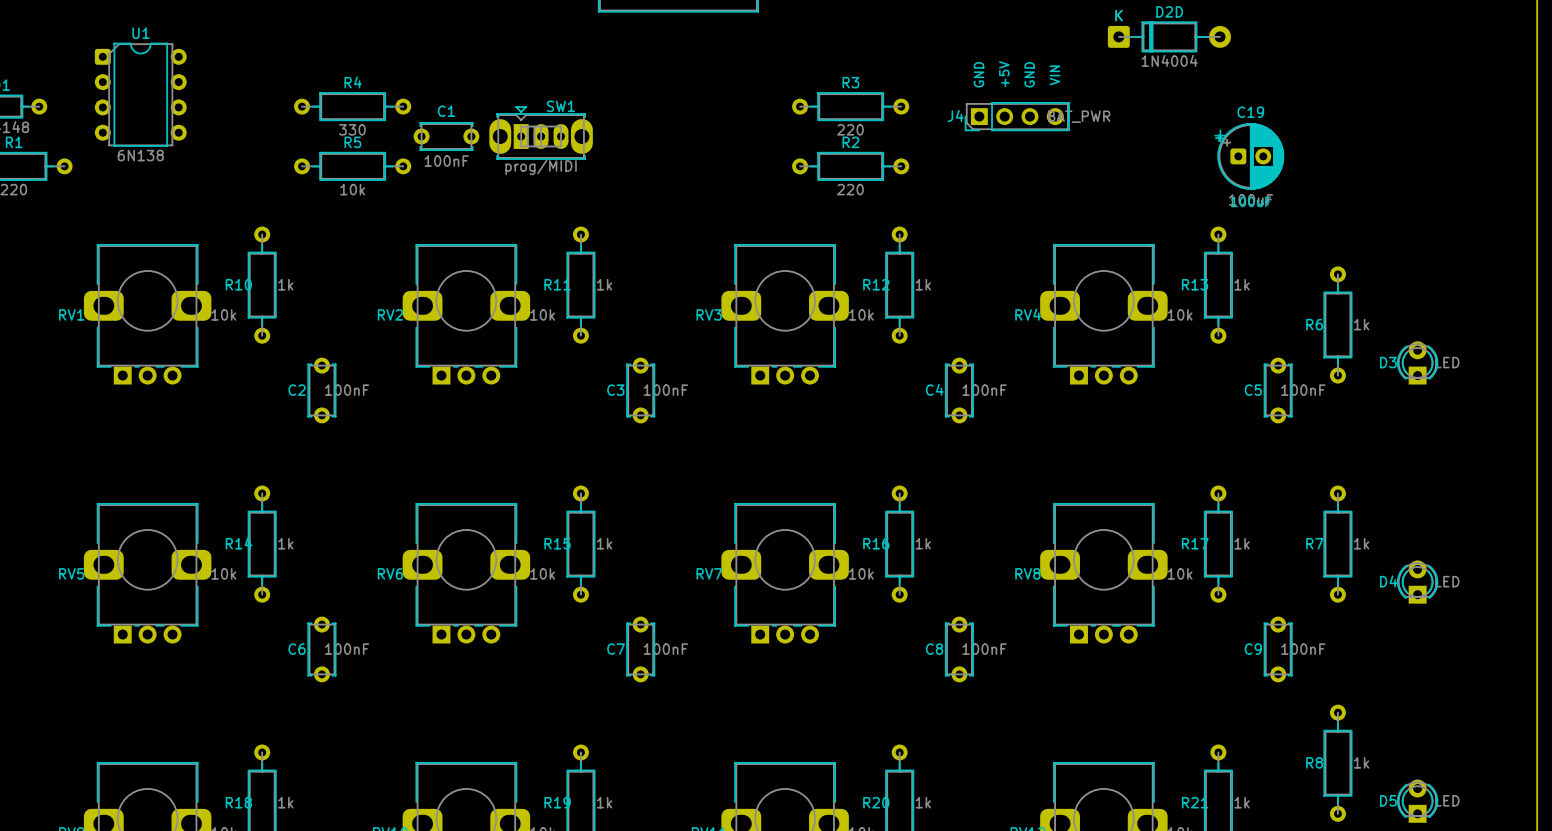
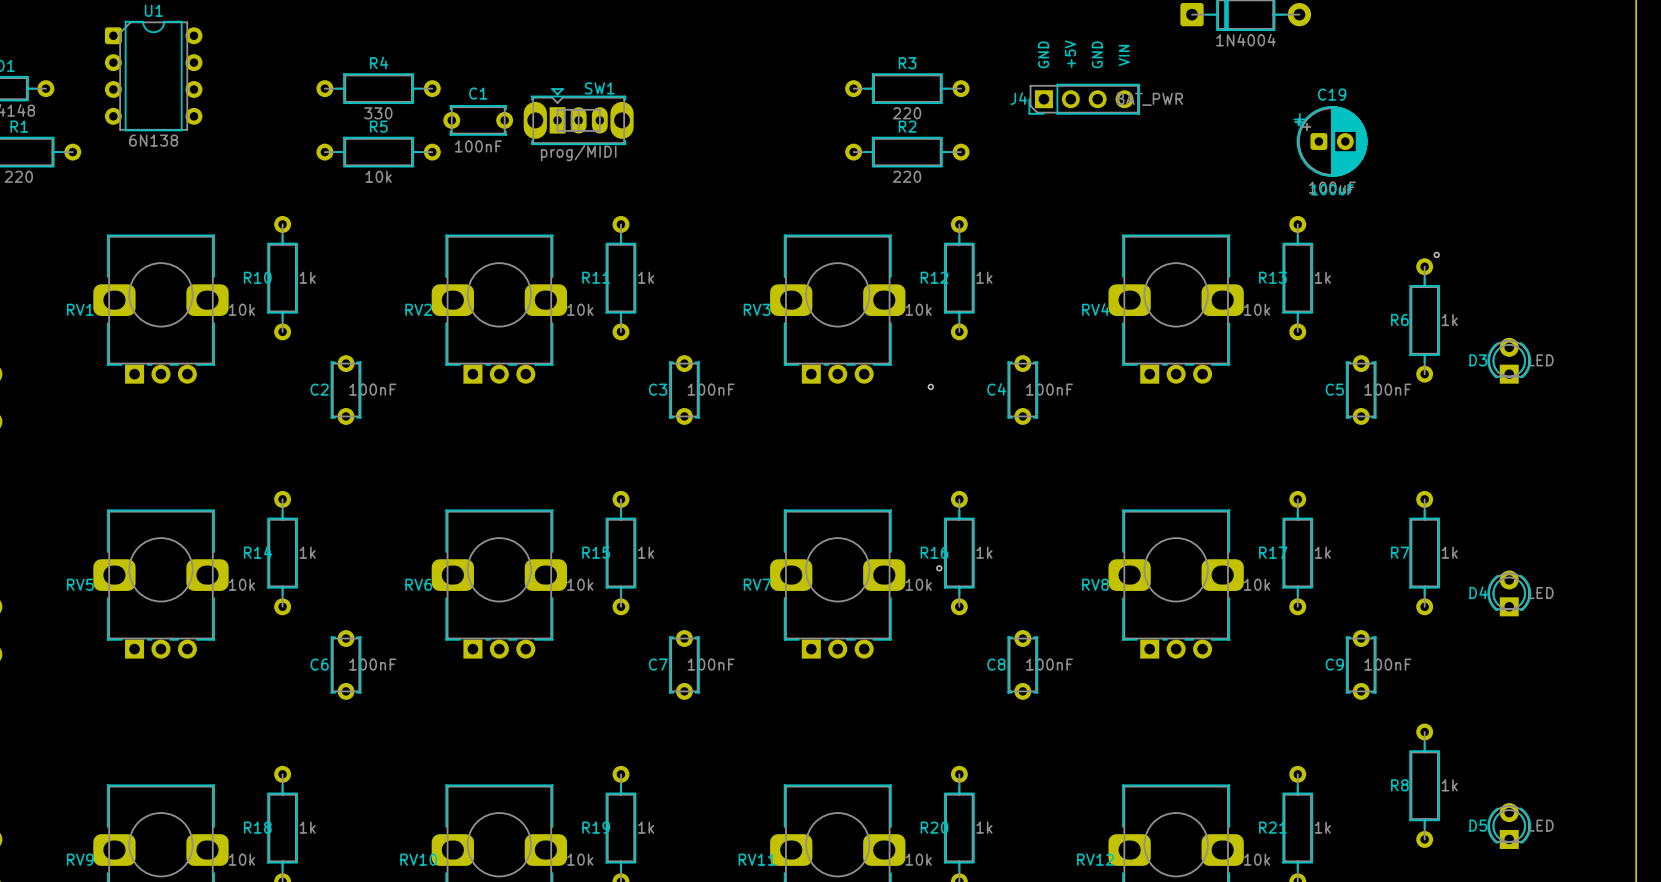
via: none -> (1436, 254)
via: none -> (930, 386)
via: none -> (939, 568)

